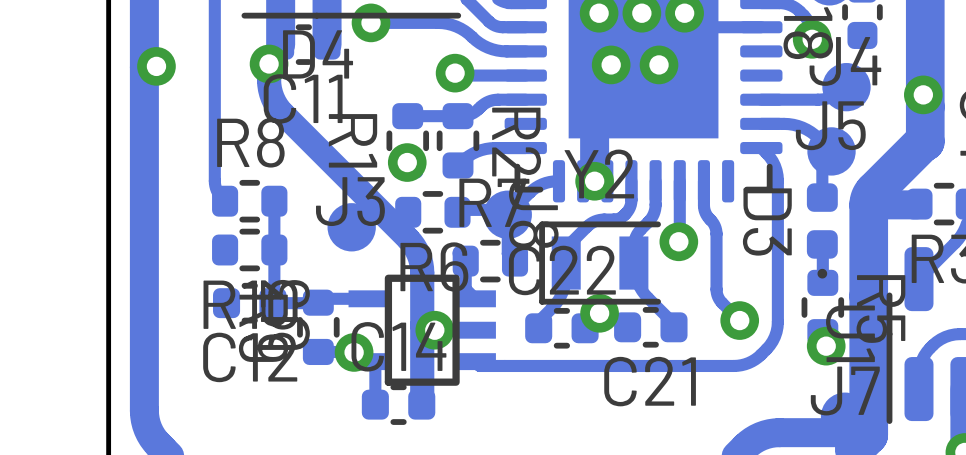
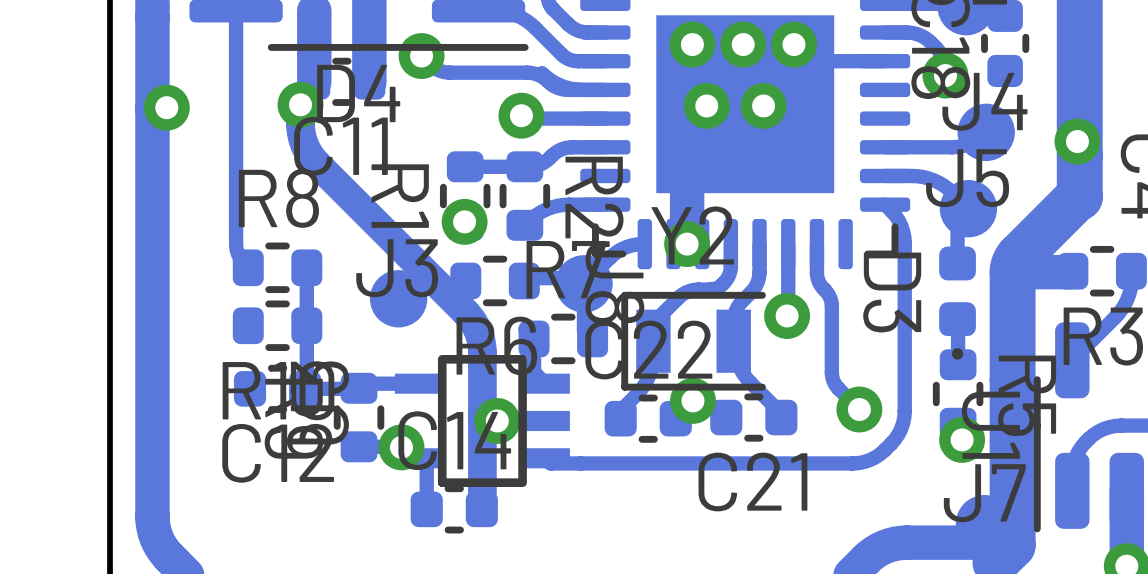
track: (371, 22) (442, 23) (460, 28) (472, 37) -> (421, 56) (434, 67) (444, 72) (531, 72) (541, 76) (559, 88) (582, 89)

